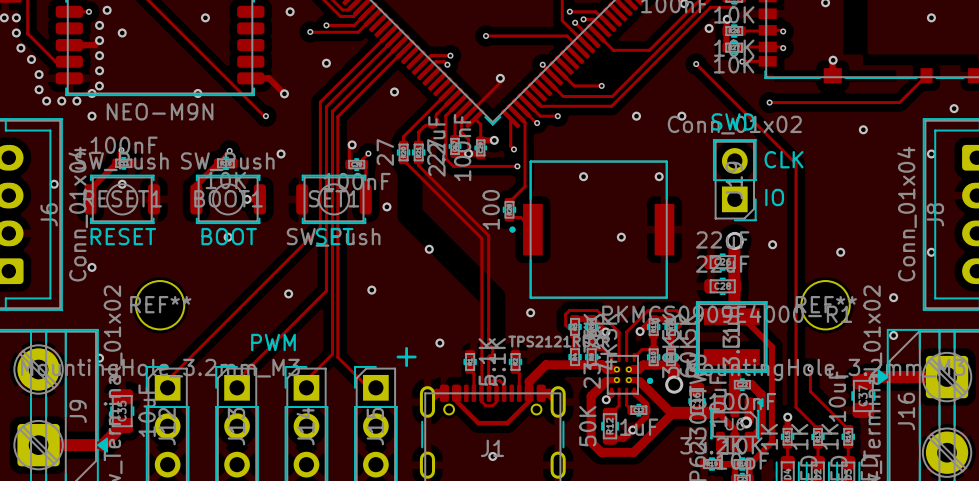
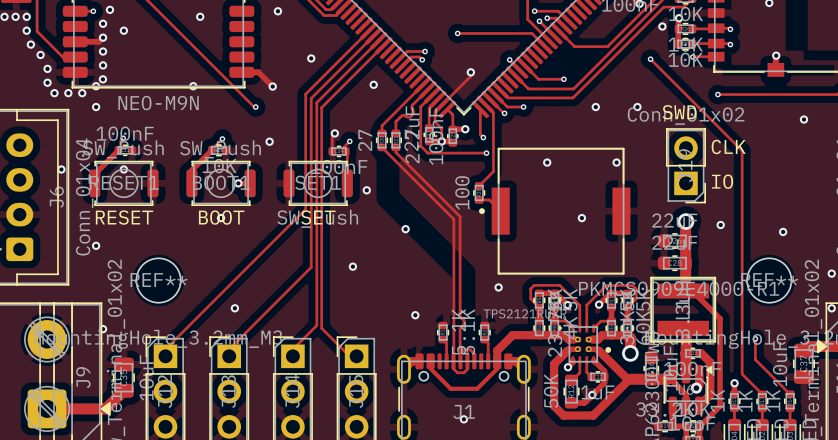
track: (367, 11) (354, 25) (326, 25) -> none
track: (373, 17) (358, 32) (310, 31) -> none
via: (326, 25) -> none
via: (310, 31) -> none
via position: (288, 293) -> (234, 308)
text: PWM (273, 342) -> none
text: + (406, 356) -> none

